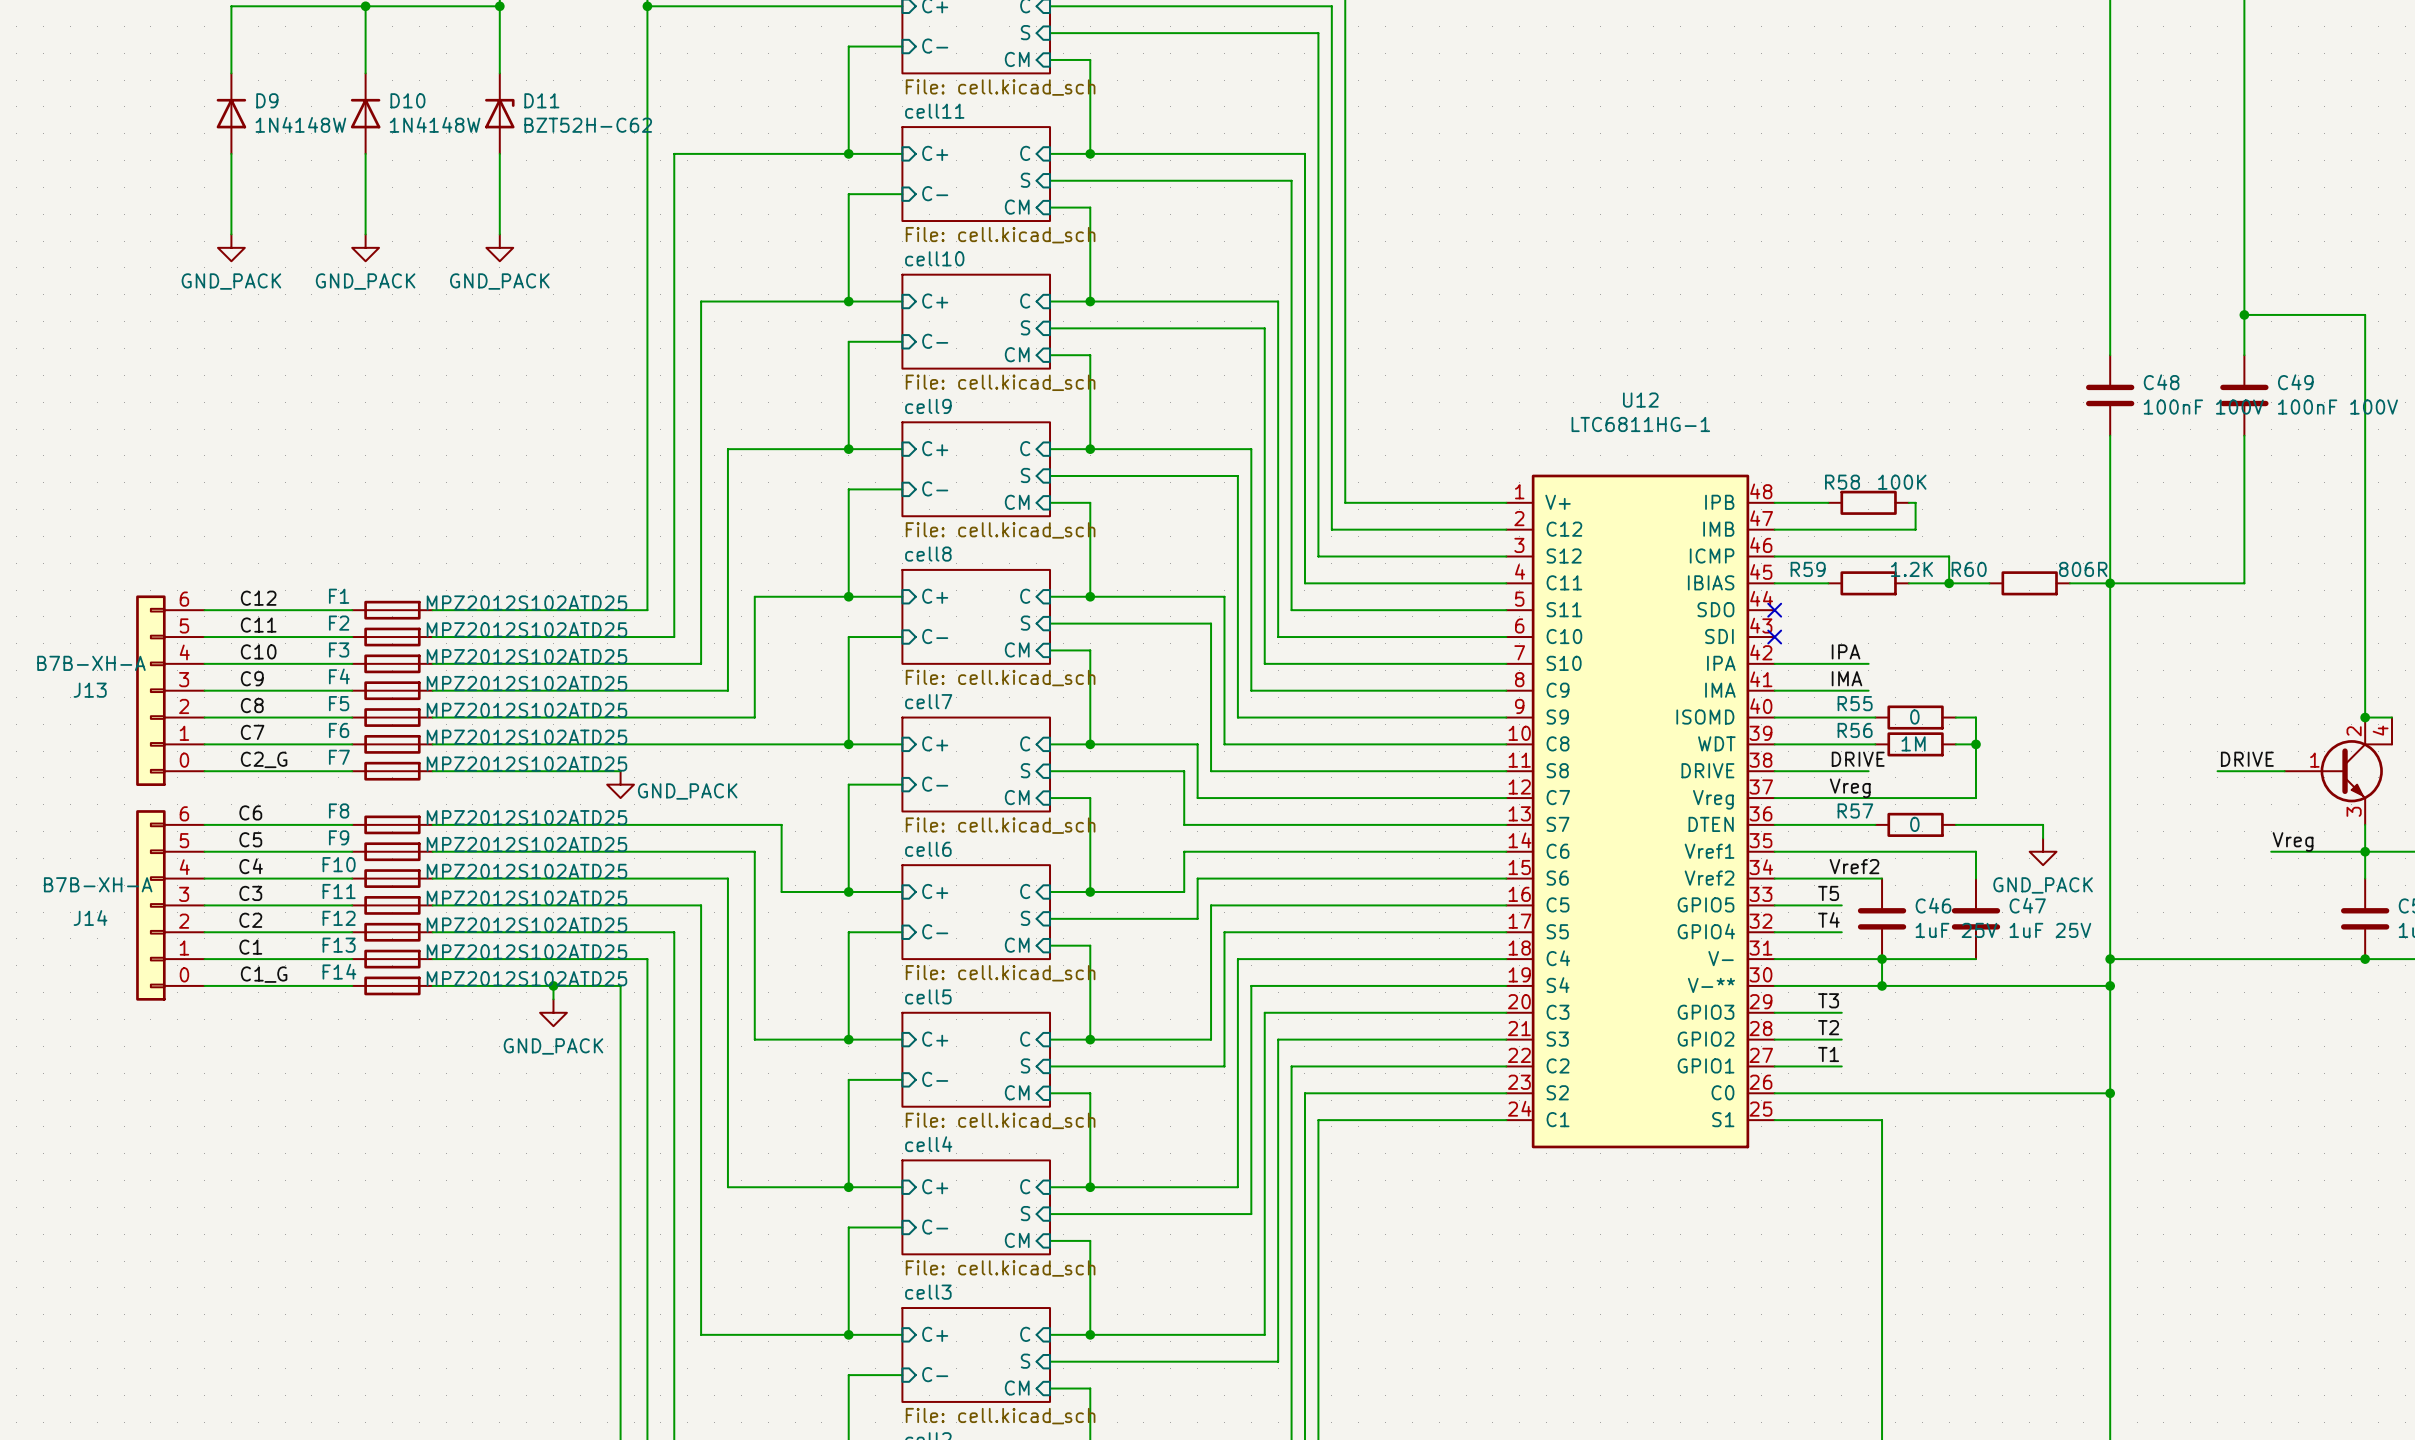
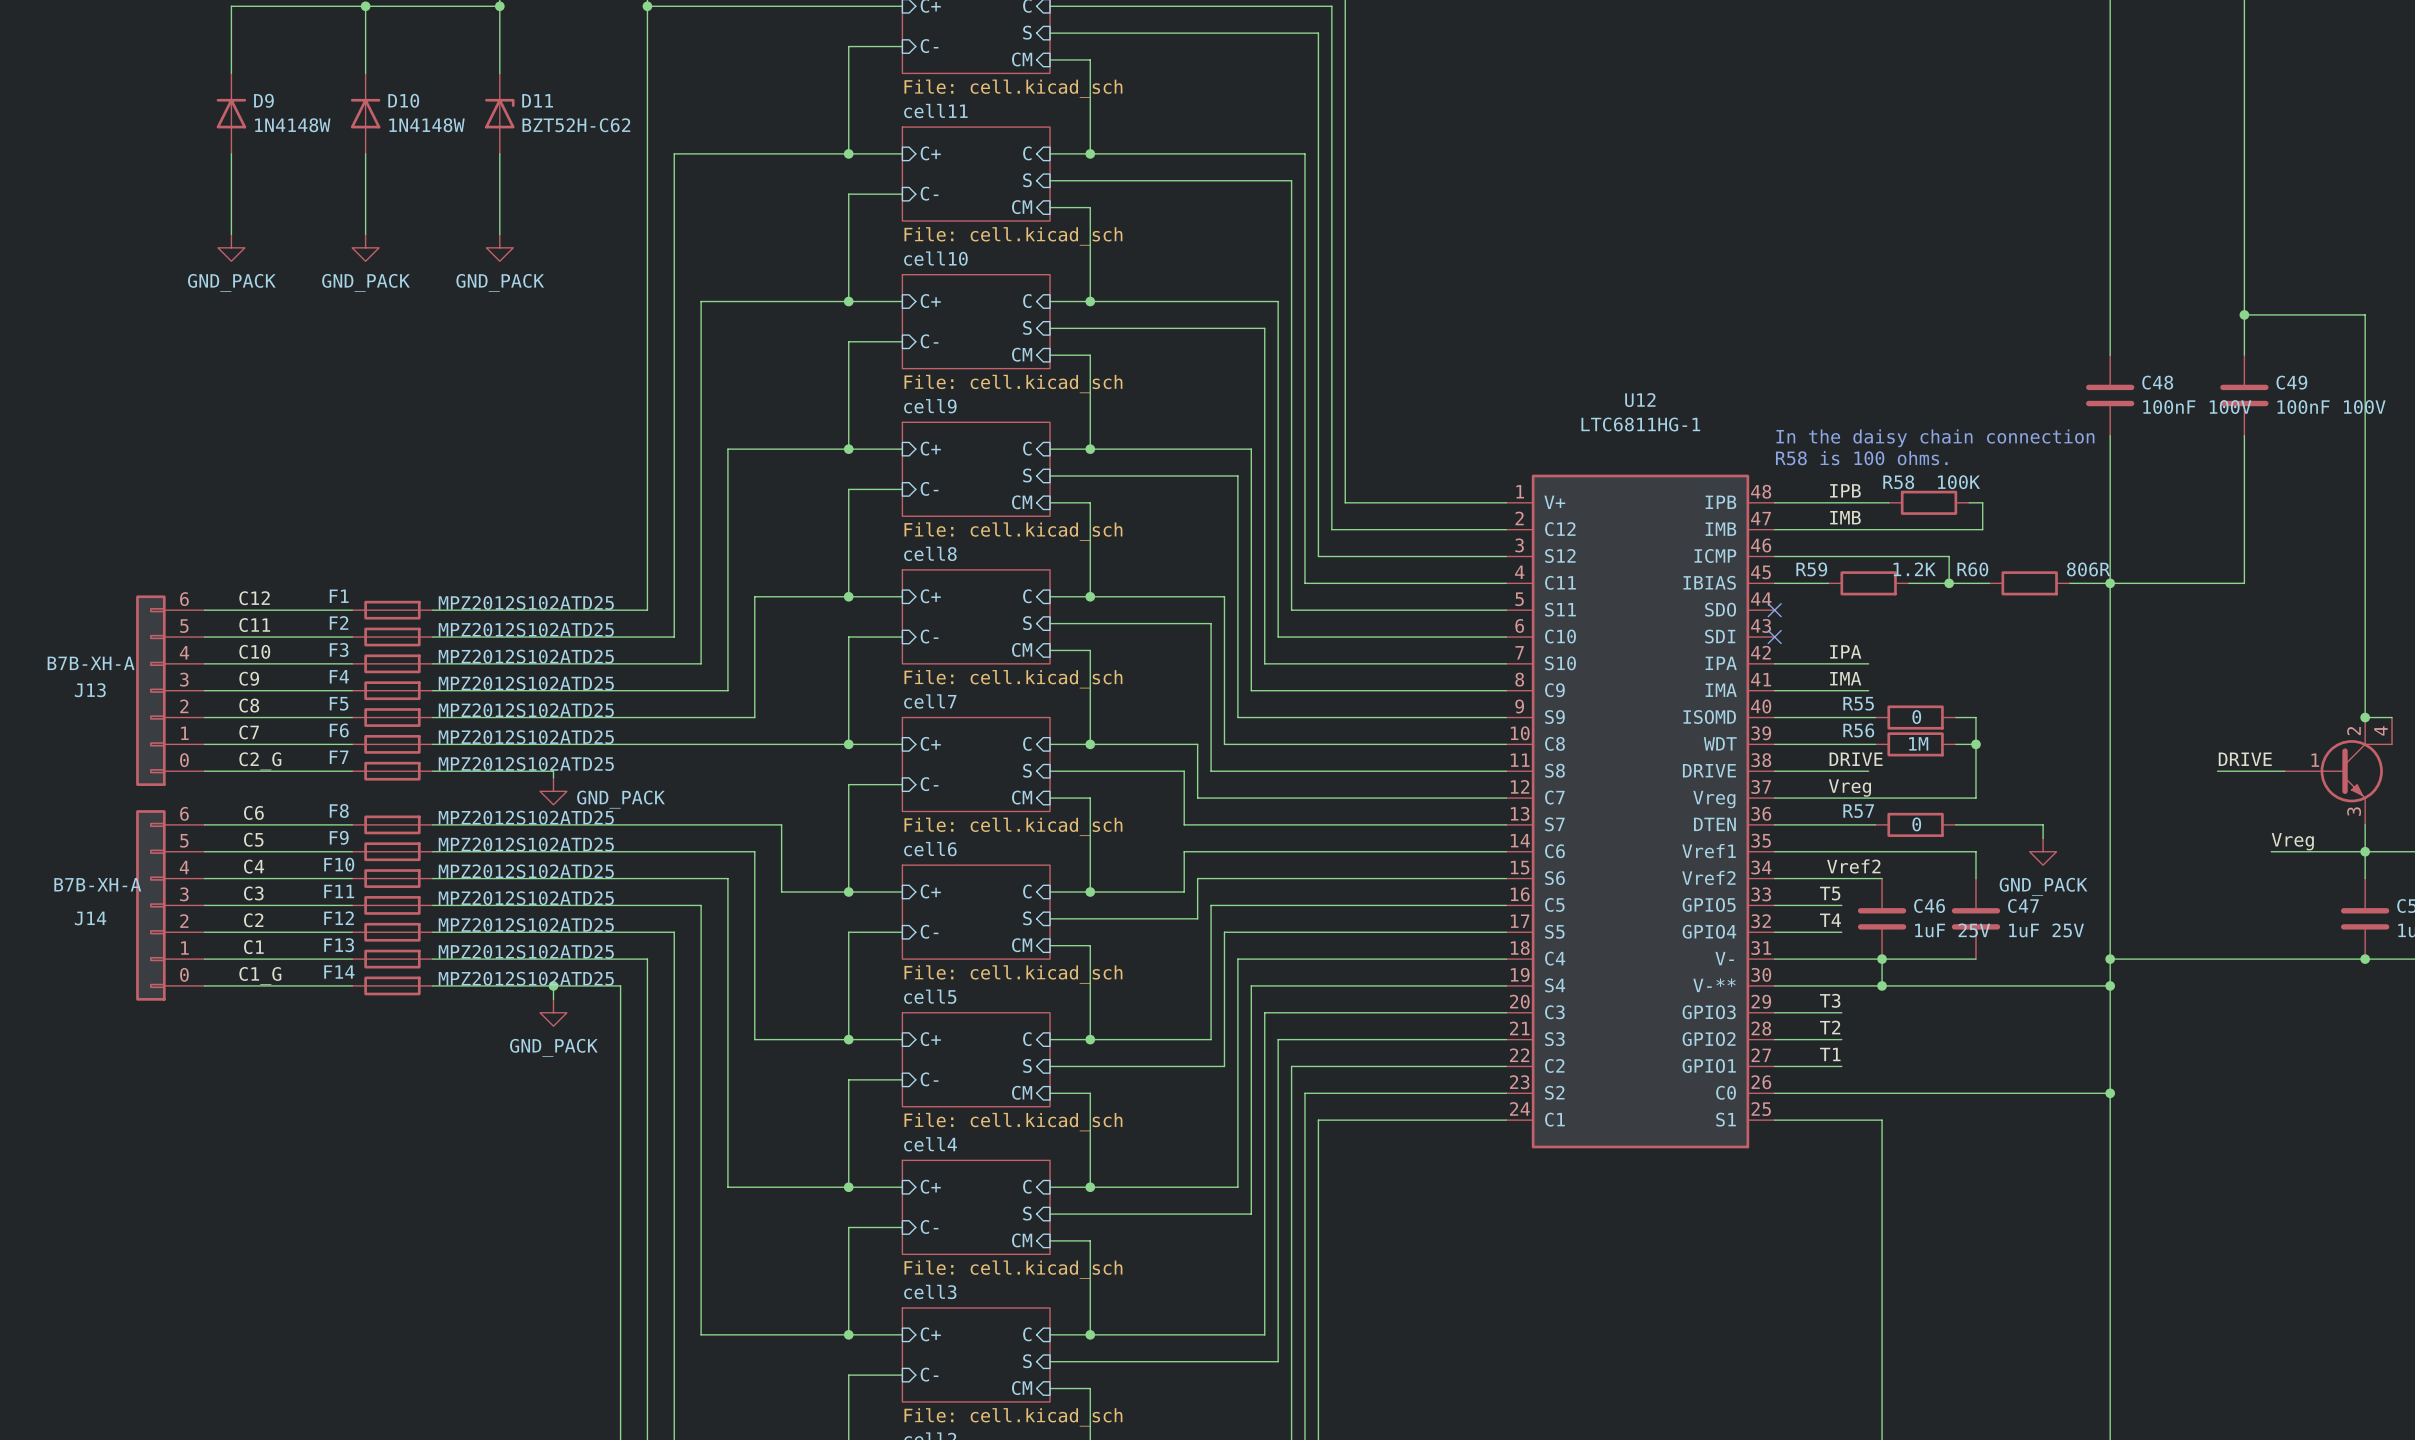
text: none -> In the daisy chain connection (1935, 438)
text: none -> R58 is 100 ohms. (1861, 458)
label: none -> IPB (1845, 490)
wire: none -> (1828, 502) (1888, 502)
R58 position: (1868, 502) -> (1929, 502)
wire: (1908, 502) (1915, 502) (1915, 529) -> (1969, 502) (1982, 502) (1982, 529) (1915, 529)
label: none -> IMB (1845, 517)
wire: (553, 771) (620, 771) -> (553, 771) (553, 777)
power symbol position: GND_PACK (620, 784) -> GND_PACK (553, 791)

